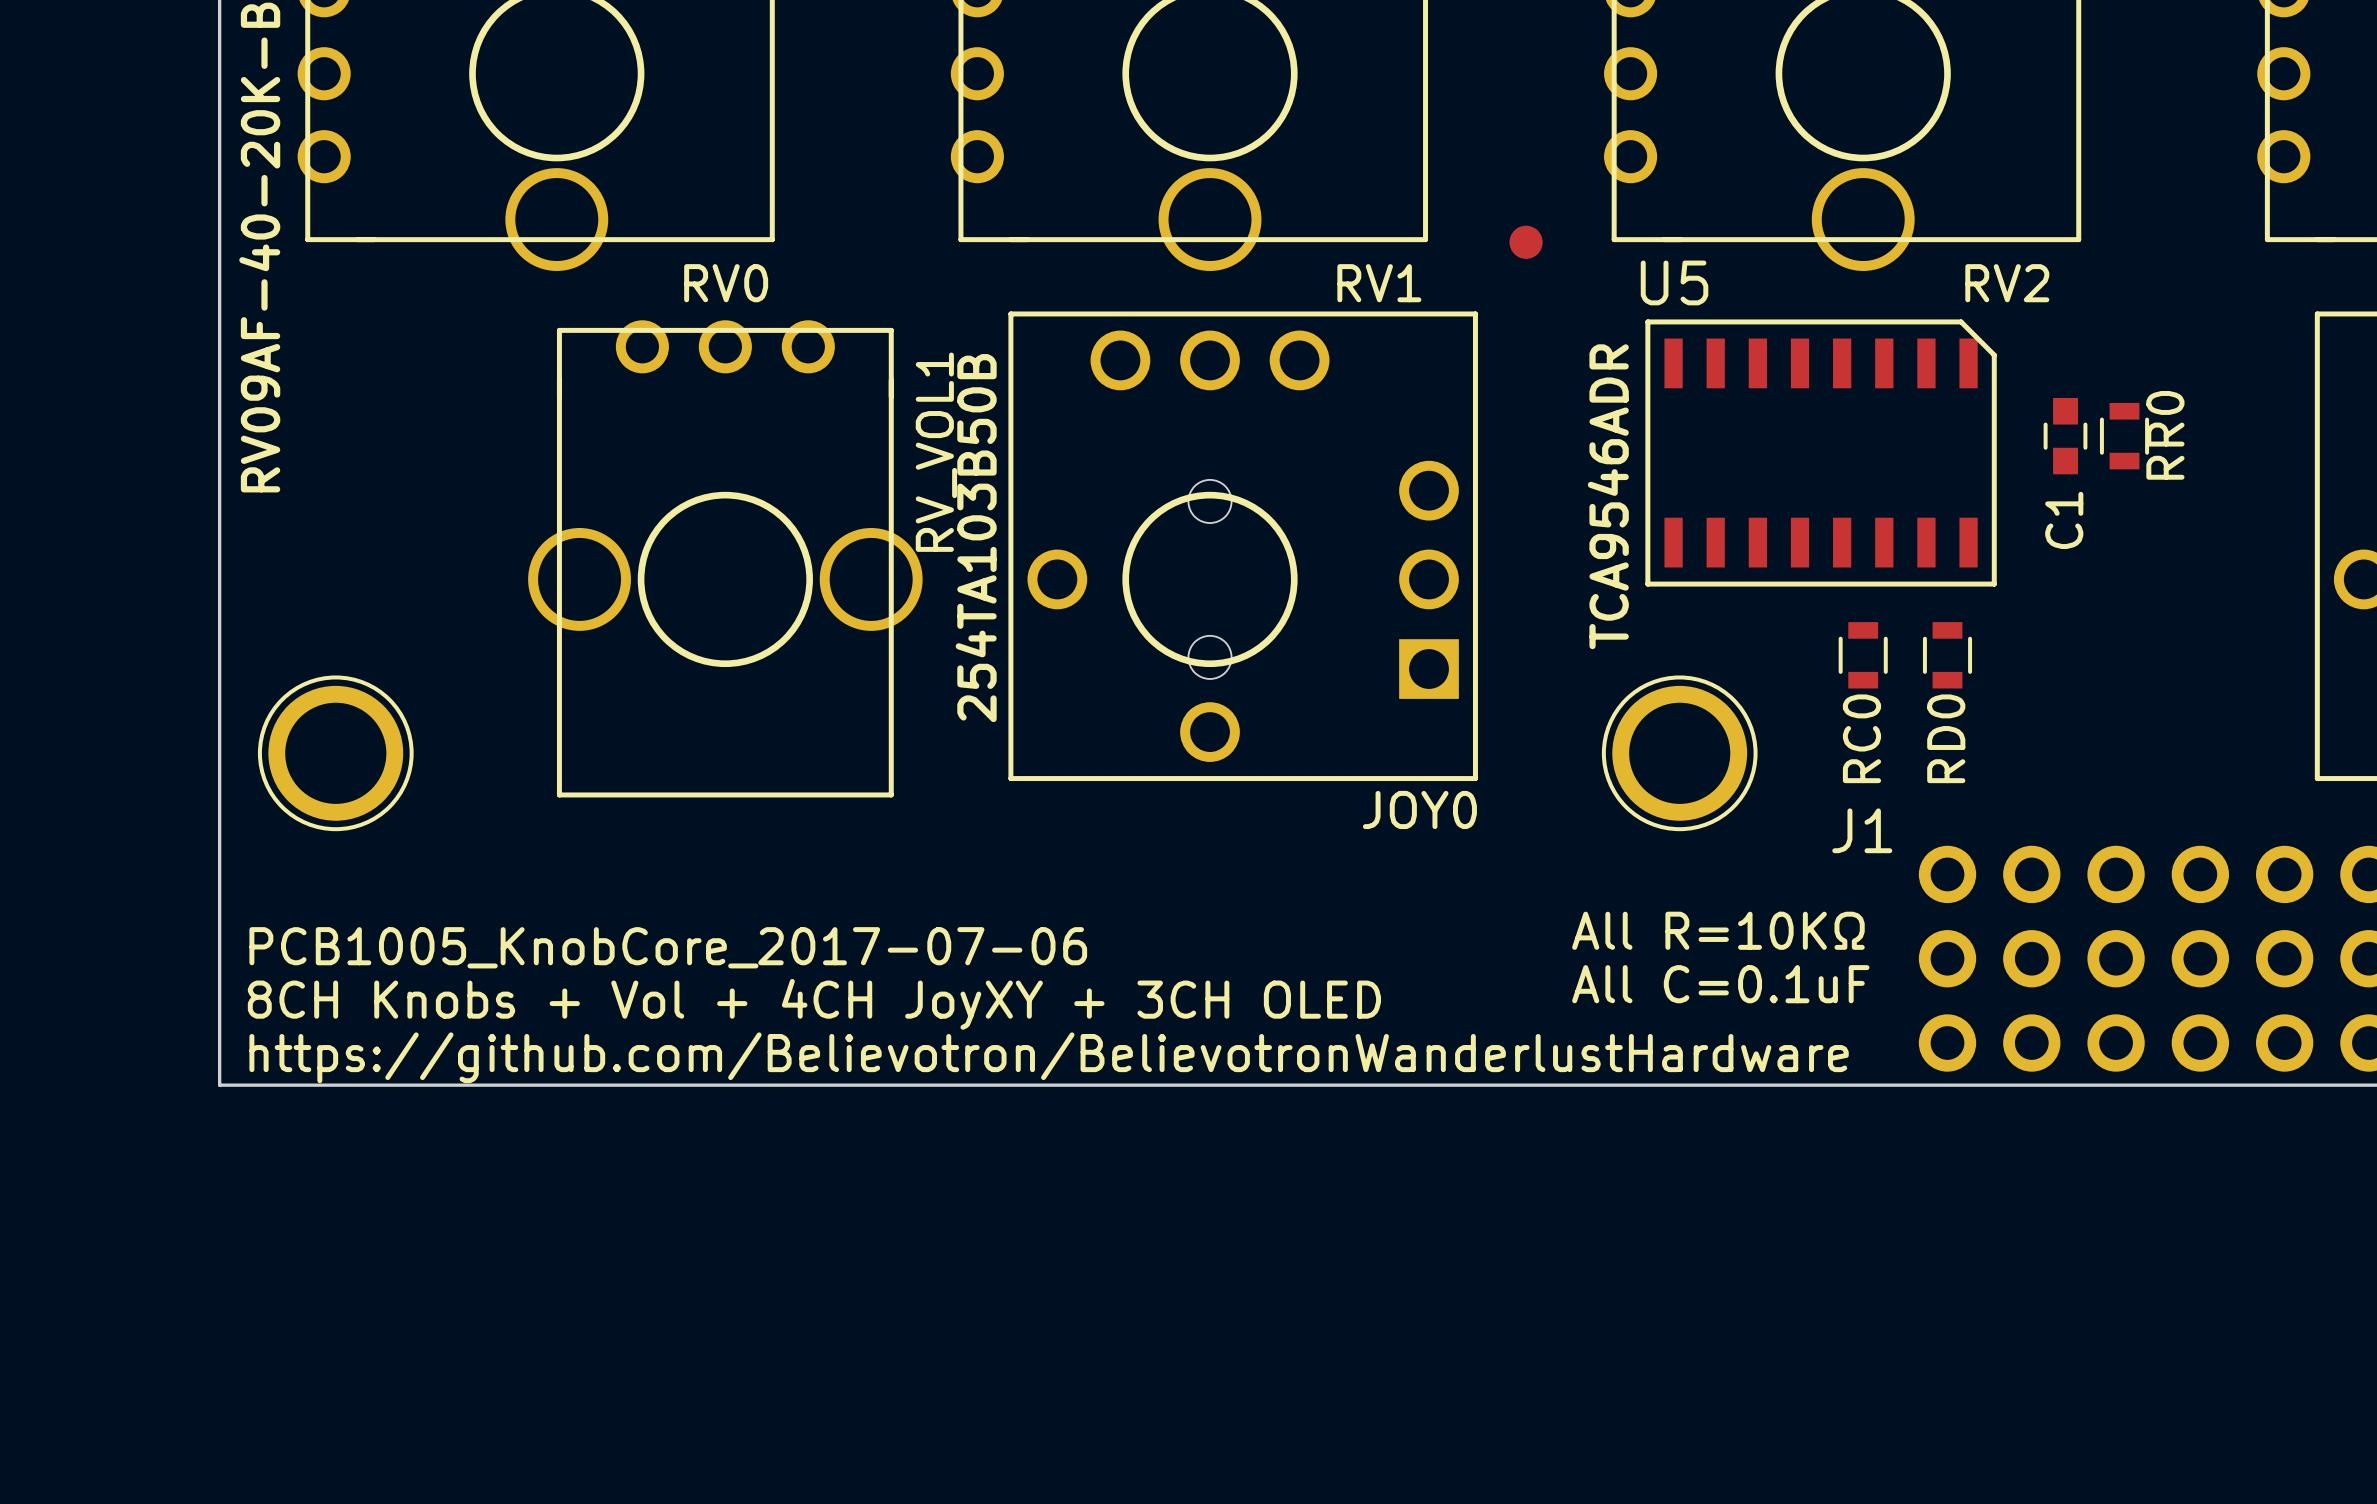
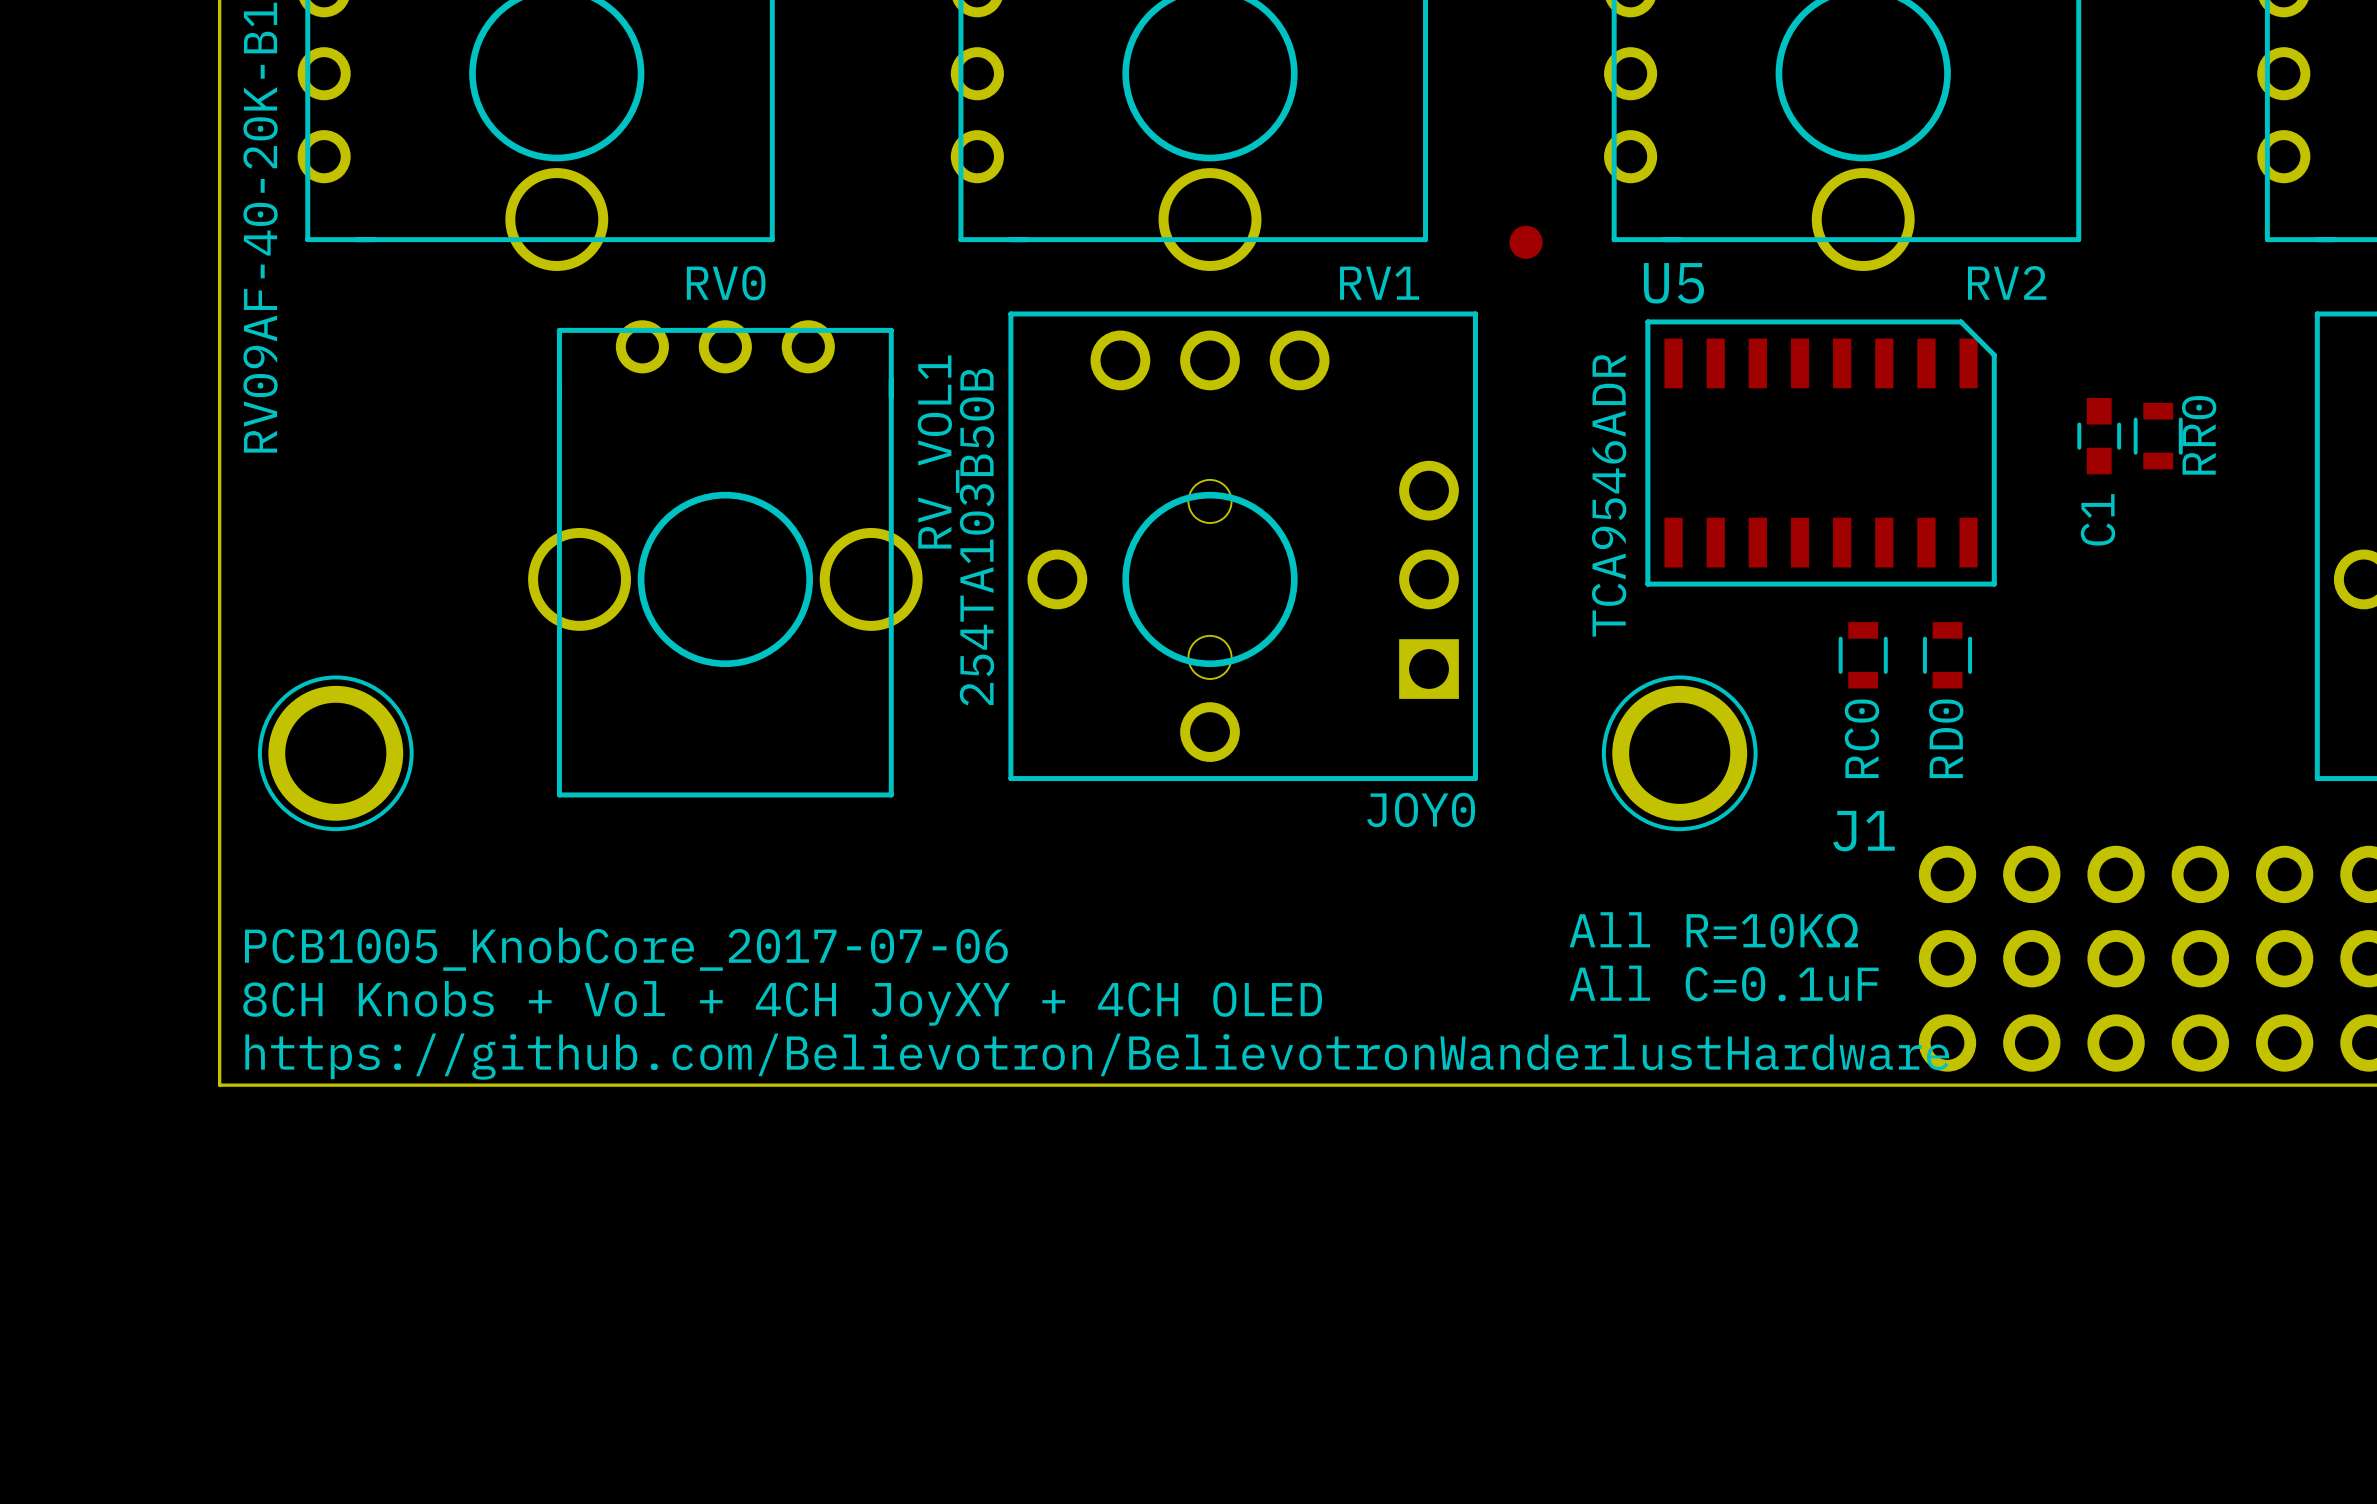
C1 position: (2065, 436) -> (2099, 436)
RR0 position: (2124, 436) -> (2158, 436)
text: 8CH Knobs + Vol + 4CH JoyXY + 3CH OLED (814, 1004) -> 8CH Knobs + Vol + 4CH JoyXY + 4CH OLED (782, 1003)

